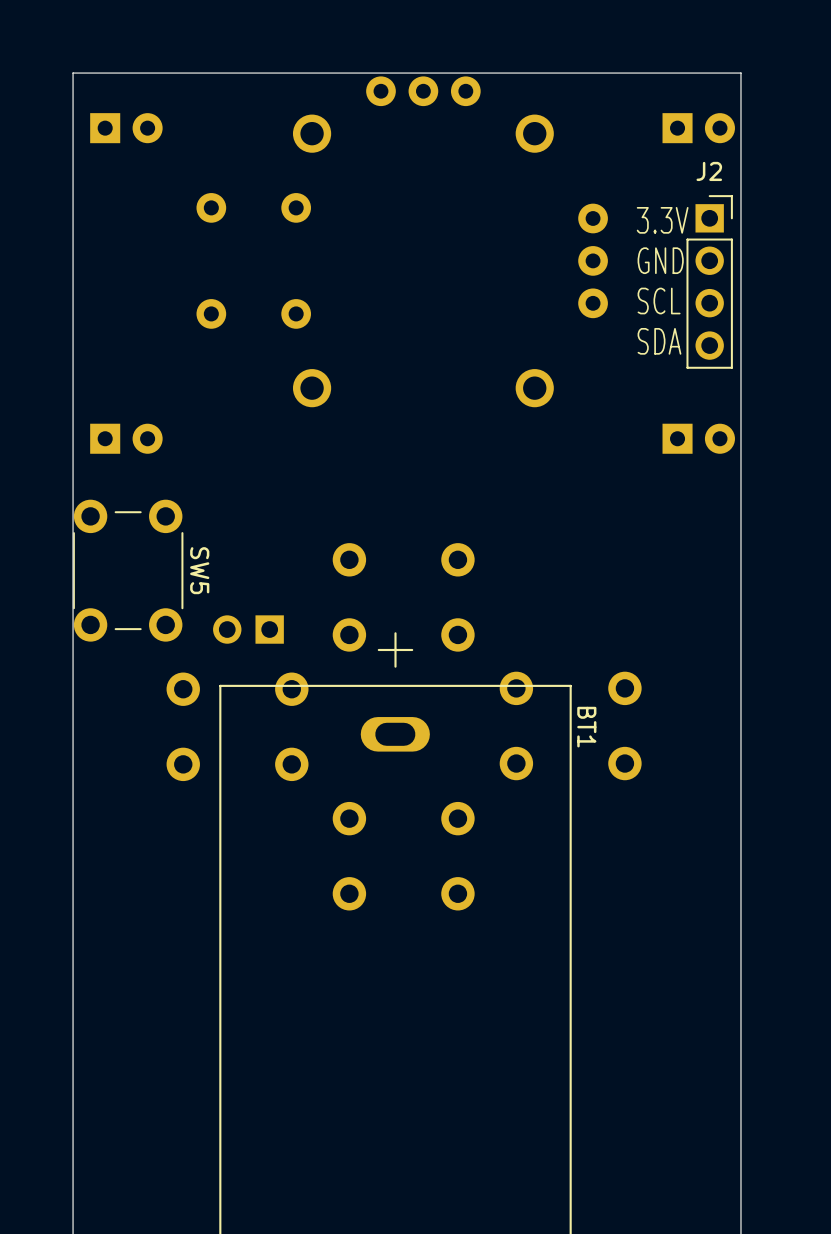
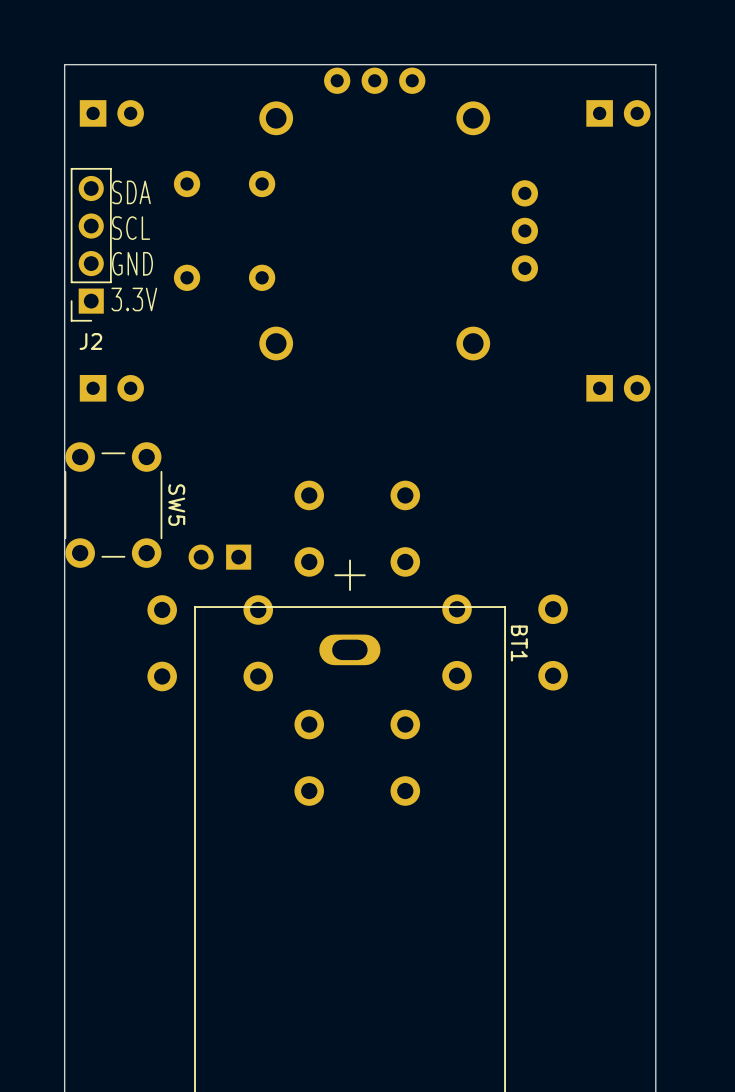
text: none -> SDA (131, 192)
text: 3.3V (662, 220) -> none
text: none -> SCL (131, 228)
text: GND (660, 260) -> none
J2 rotation: 0° (709, 281) -> 180° (91, 244)
J2 position: (709, 281) -> (91, 244)
text: none -> GND (132, 263)
text: SCL (659, 301) -> none
text: none -> 3.3V (134, 299)
text: SDA (659, 341) -> none

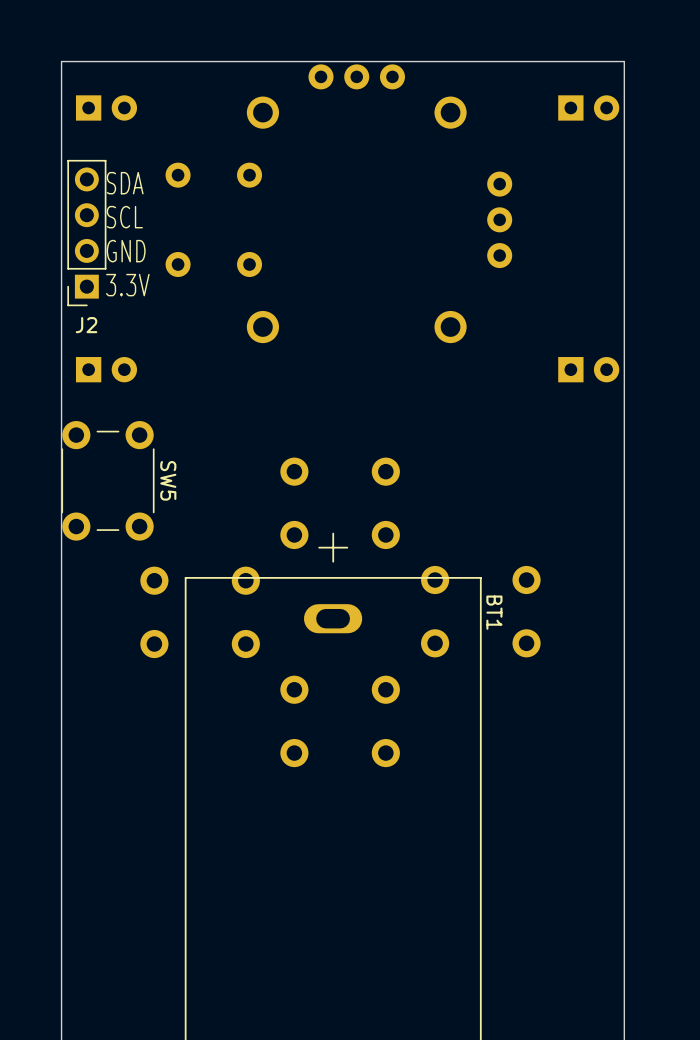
part: (219, 557) -> none

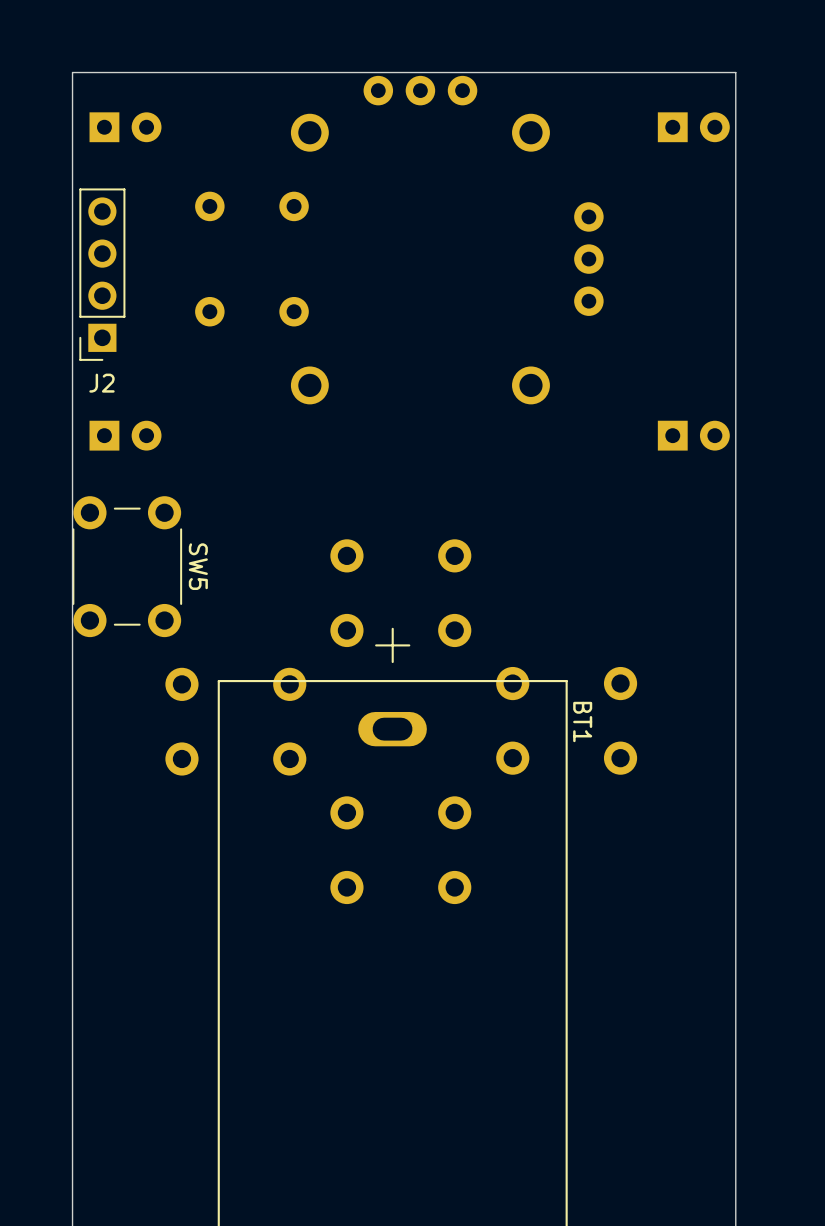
text: SDA (125, 183) -> none
text: SCL (124, 217) -> none
text: GND (126, 251) -> none
text: 3.3V (127, 285) -> none

